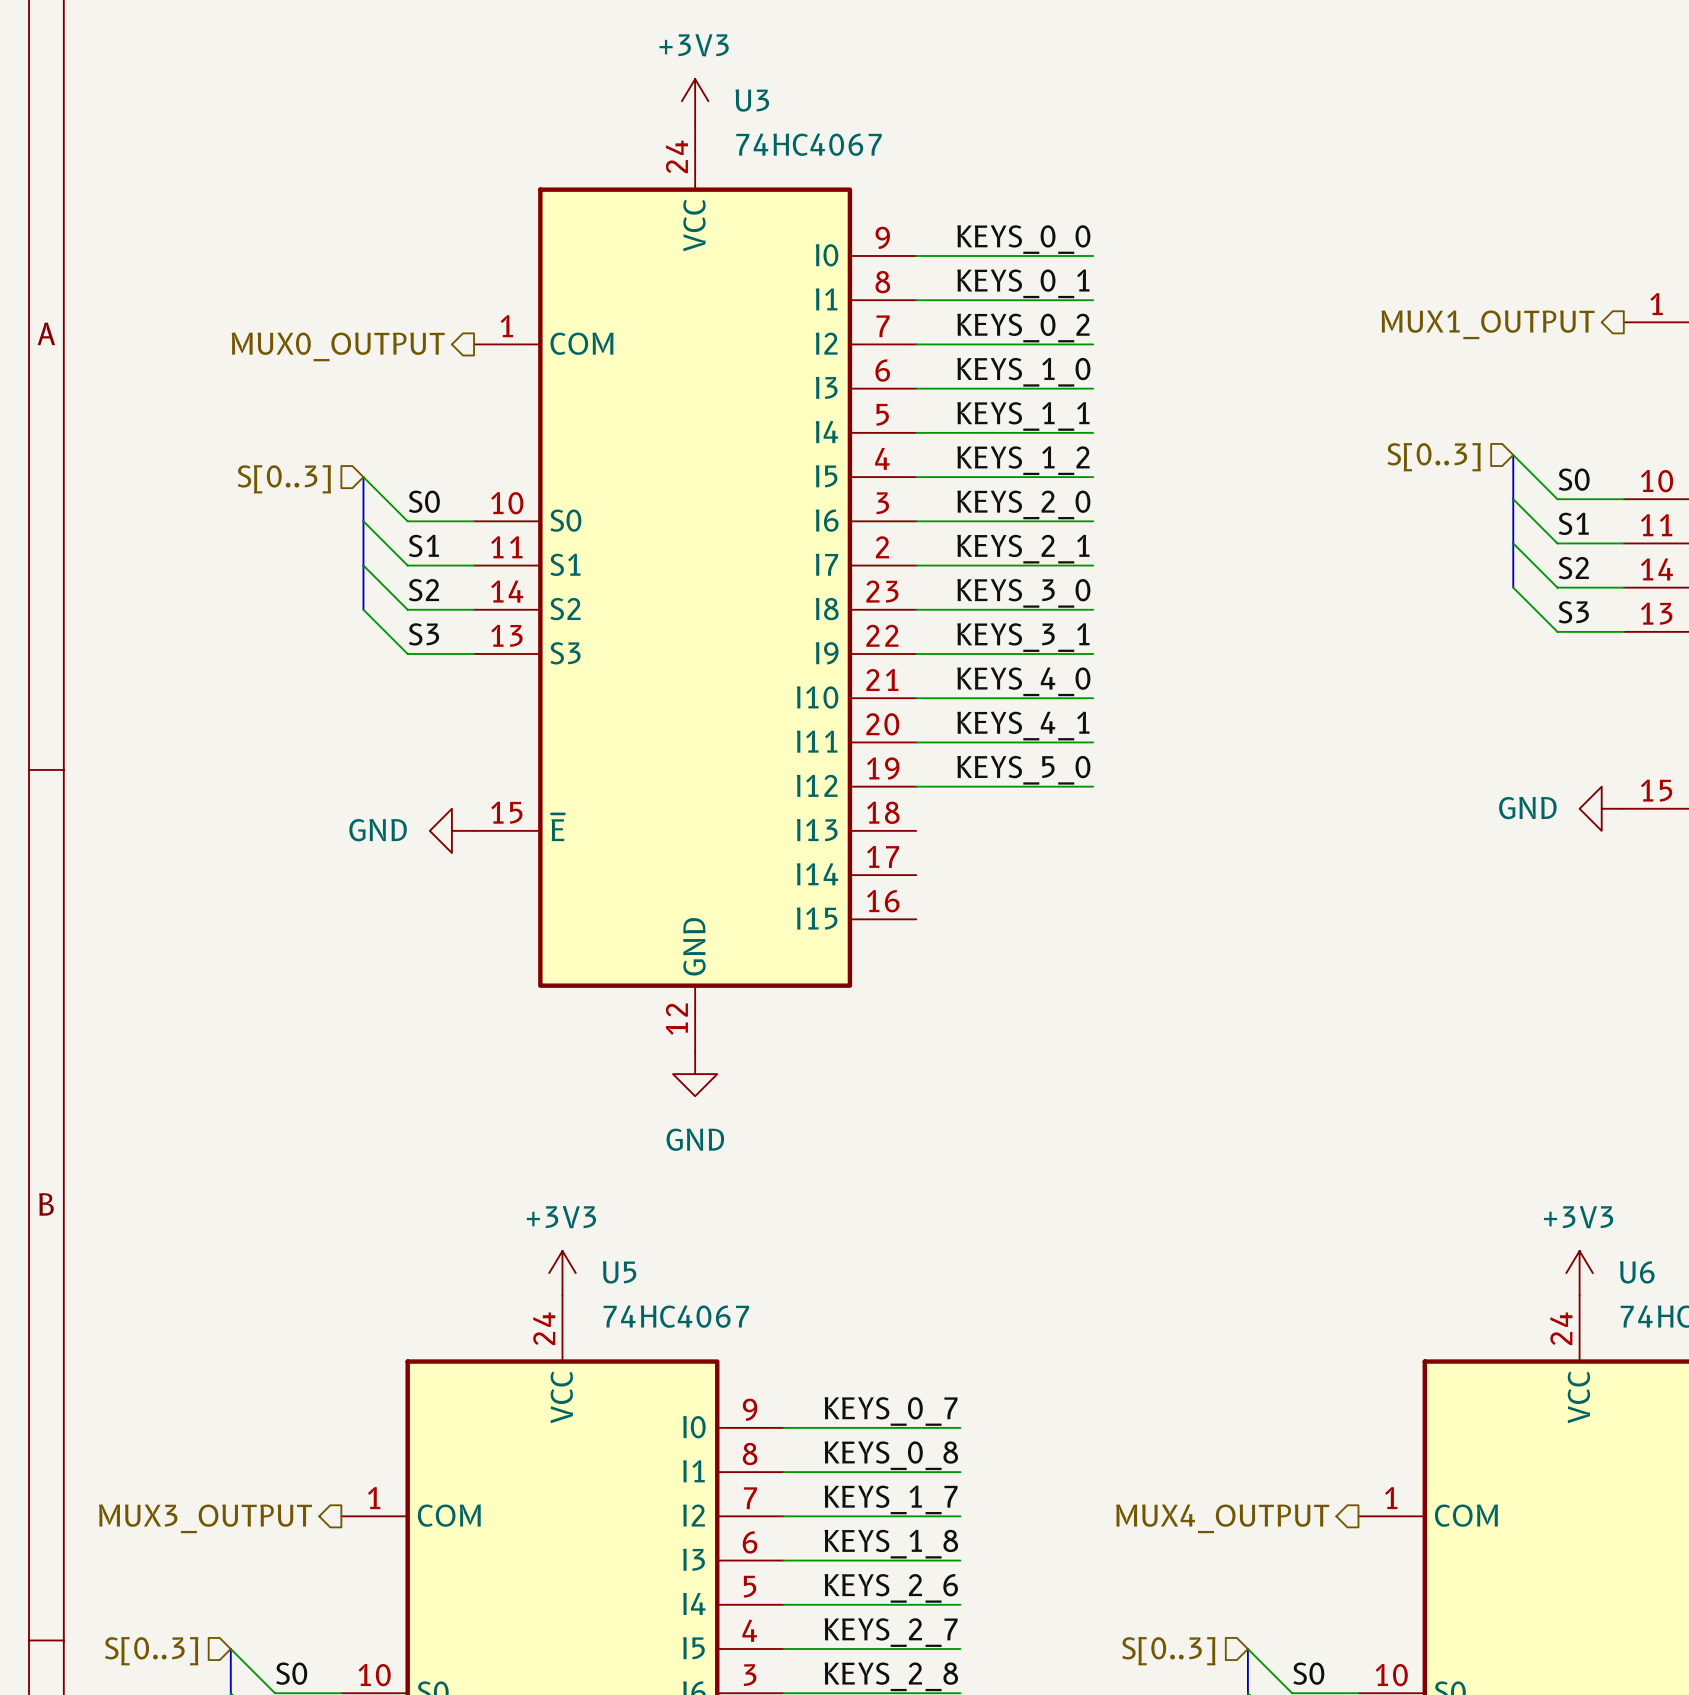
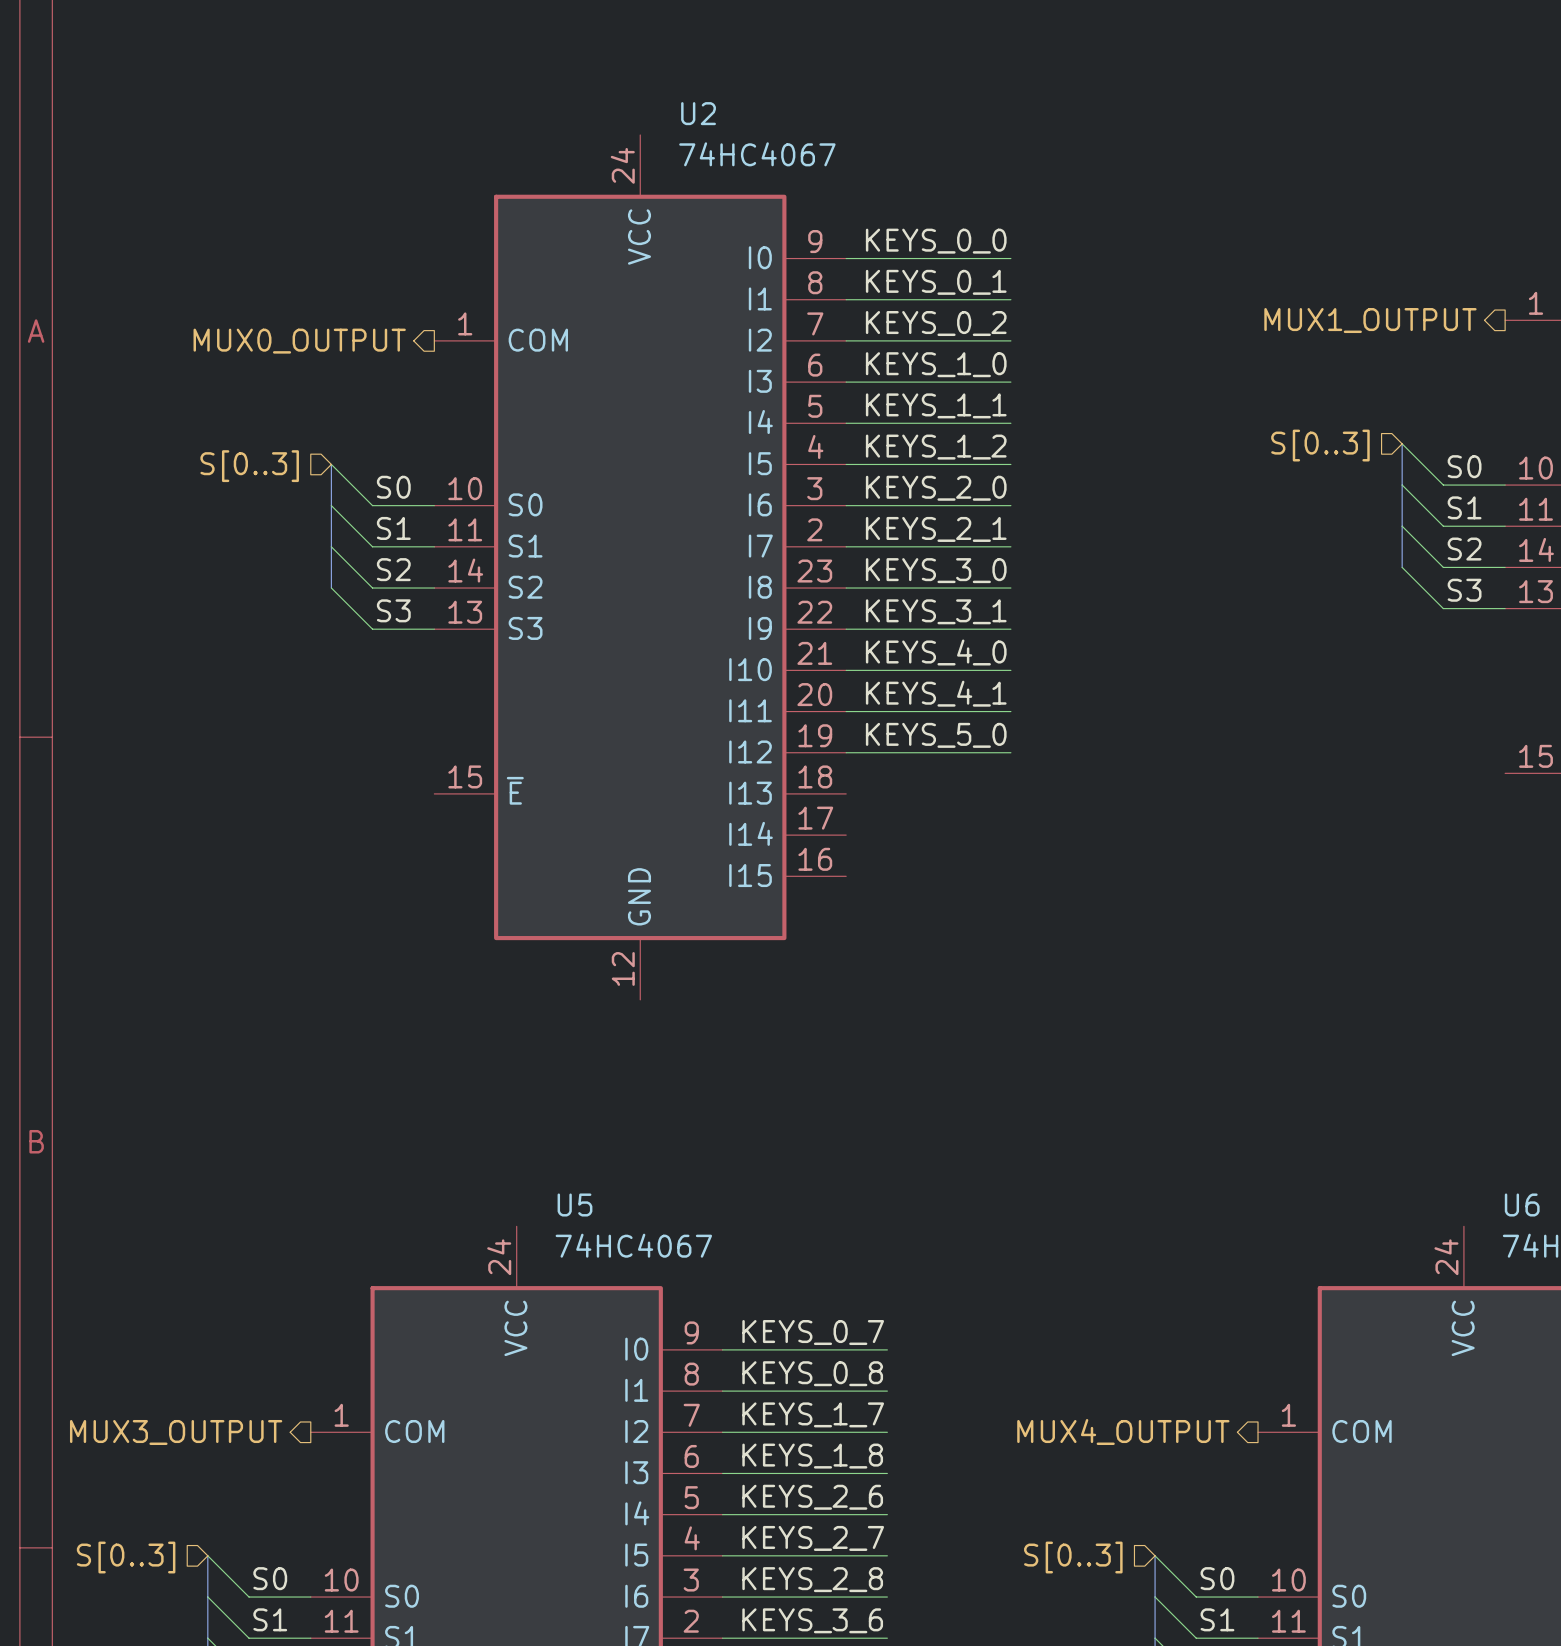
U3 name: U3 (752, 100) -> U2 (698, 113)
power symbol: +3V3 (695, 101) -> none
power symbol: GND (1601, 808) -> none
power symbol: GND (451, 830) -> none
power symbol: GND (695, 1074) -> none
power symbol: +3V3 (562, 1273) -> none
power symbol: +3V3 (1579, 1273) -> none

